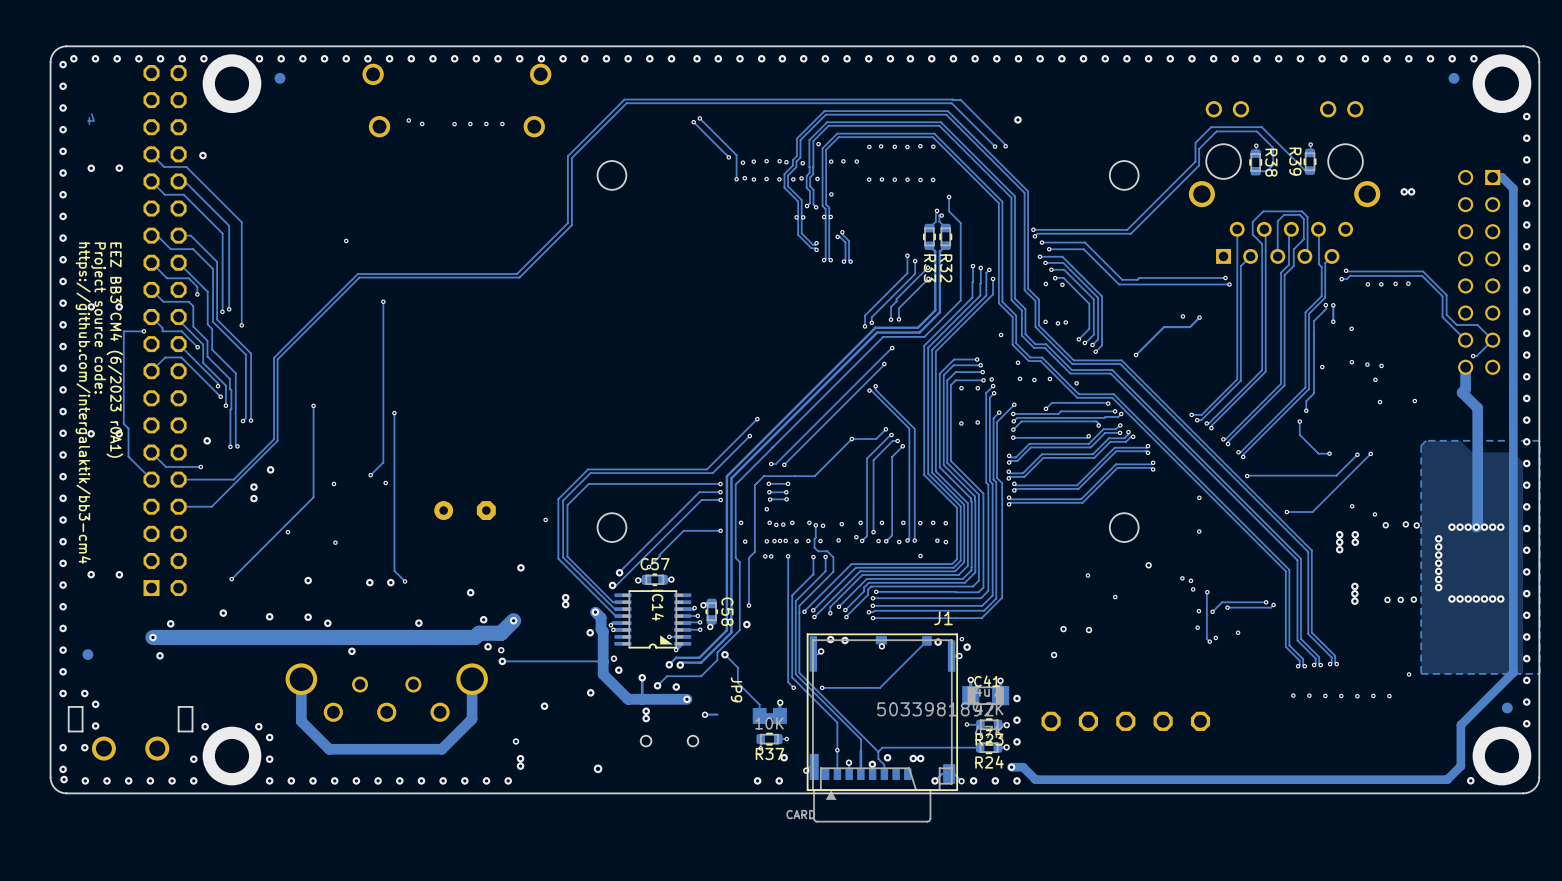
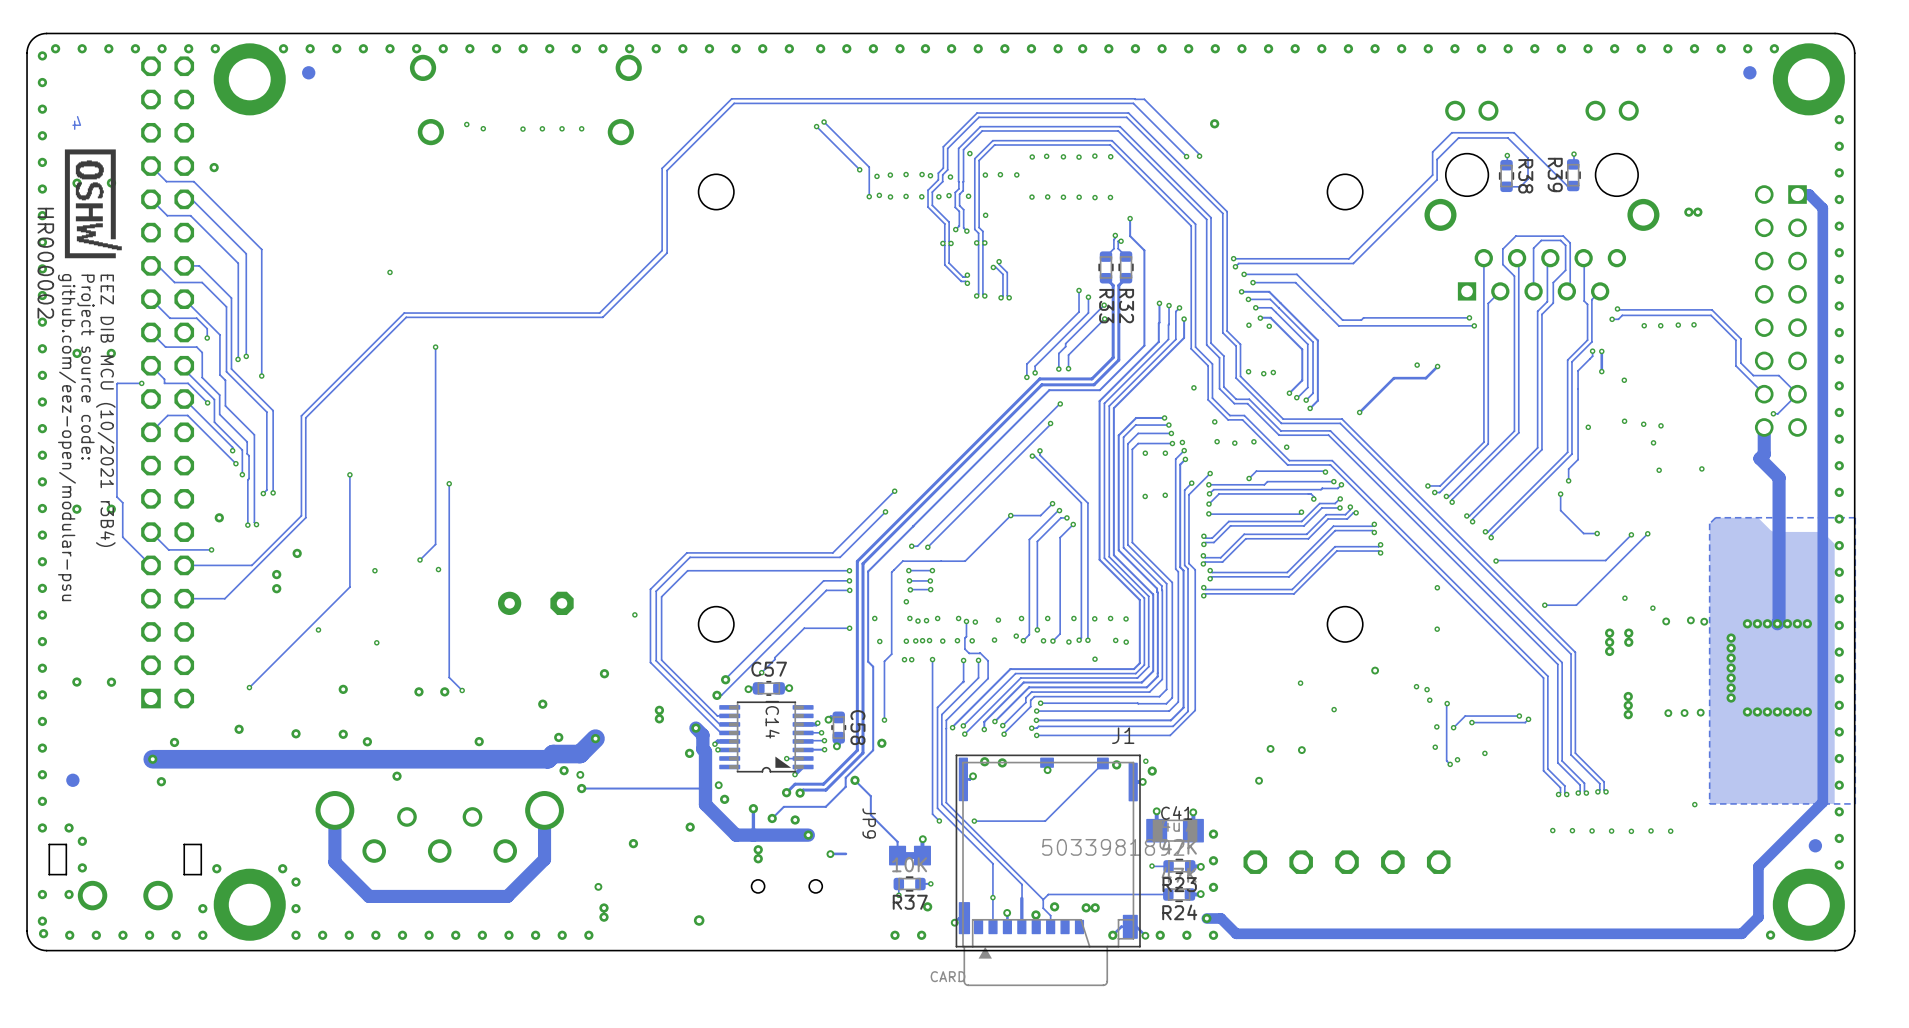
drawing: none -> [64, 149, 122, 259]
text: EEZ BB3 CM4 (6/2023 r0A1) (114, 350) -> EEZ DIB MCU (10/2021 r3B4) (105, 410)
text: https://github.com/intergalaktik/bb3-cm4 (83, 403) -> github.com/eez-open/modular-psu (66, 437)

